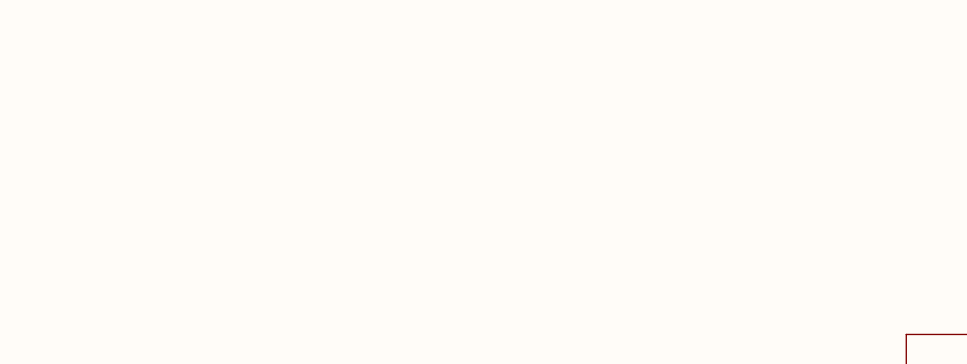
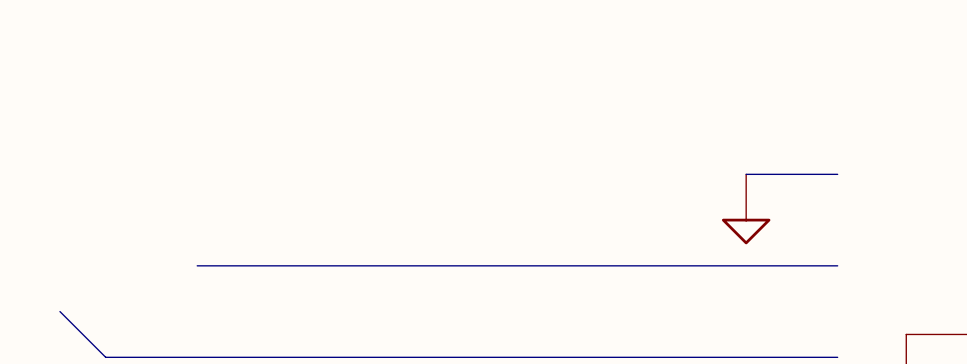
wire: none -> (746, 174) (837, 174)
power symbol: none -> (746, 209)
wire: none -> (197, 265) (837, 265)
wire: none -> (59, 311) (105, 357) (837, 357)

